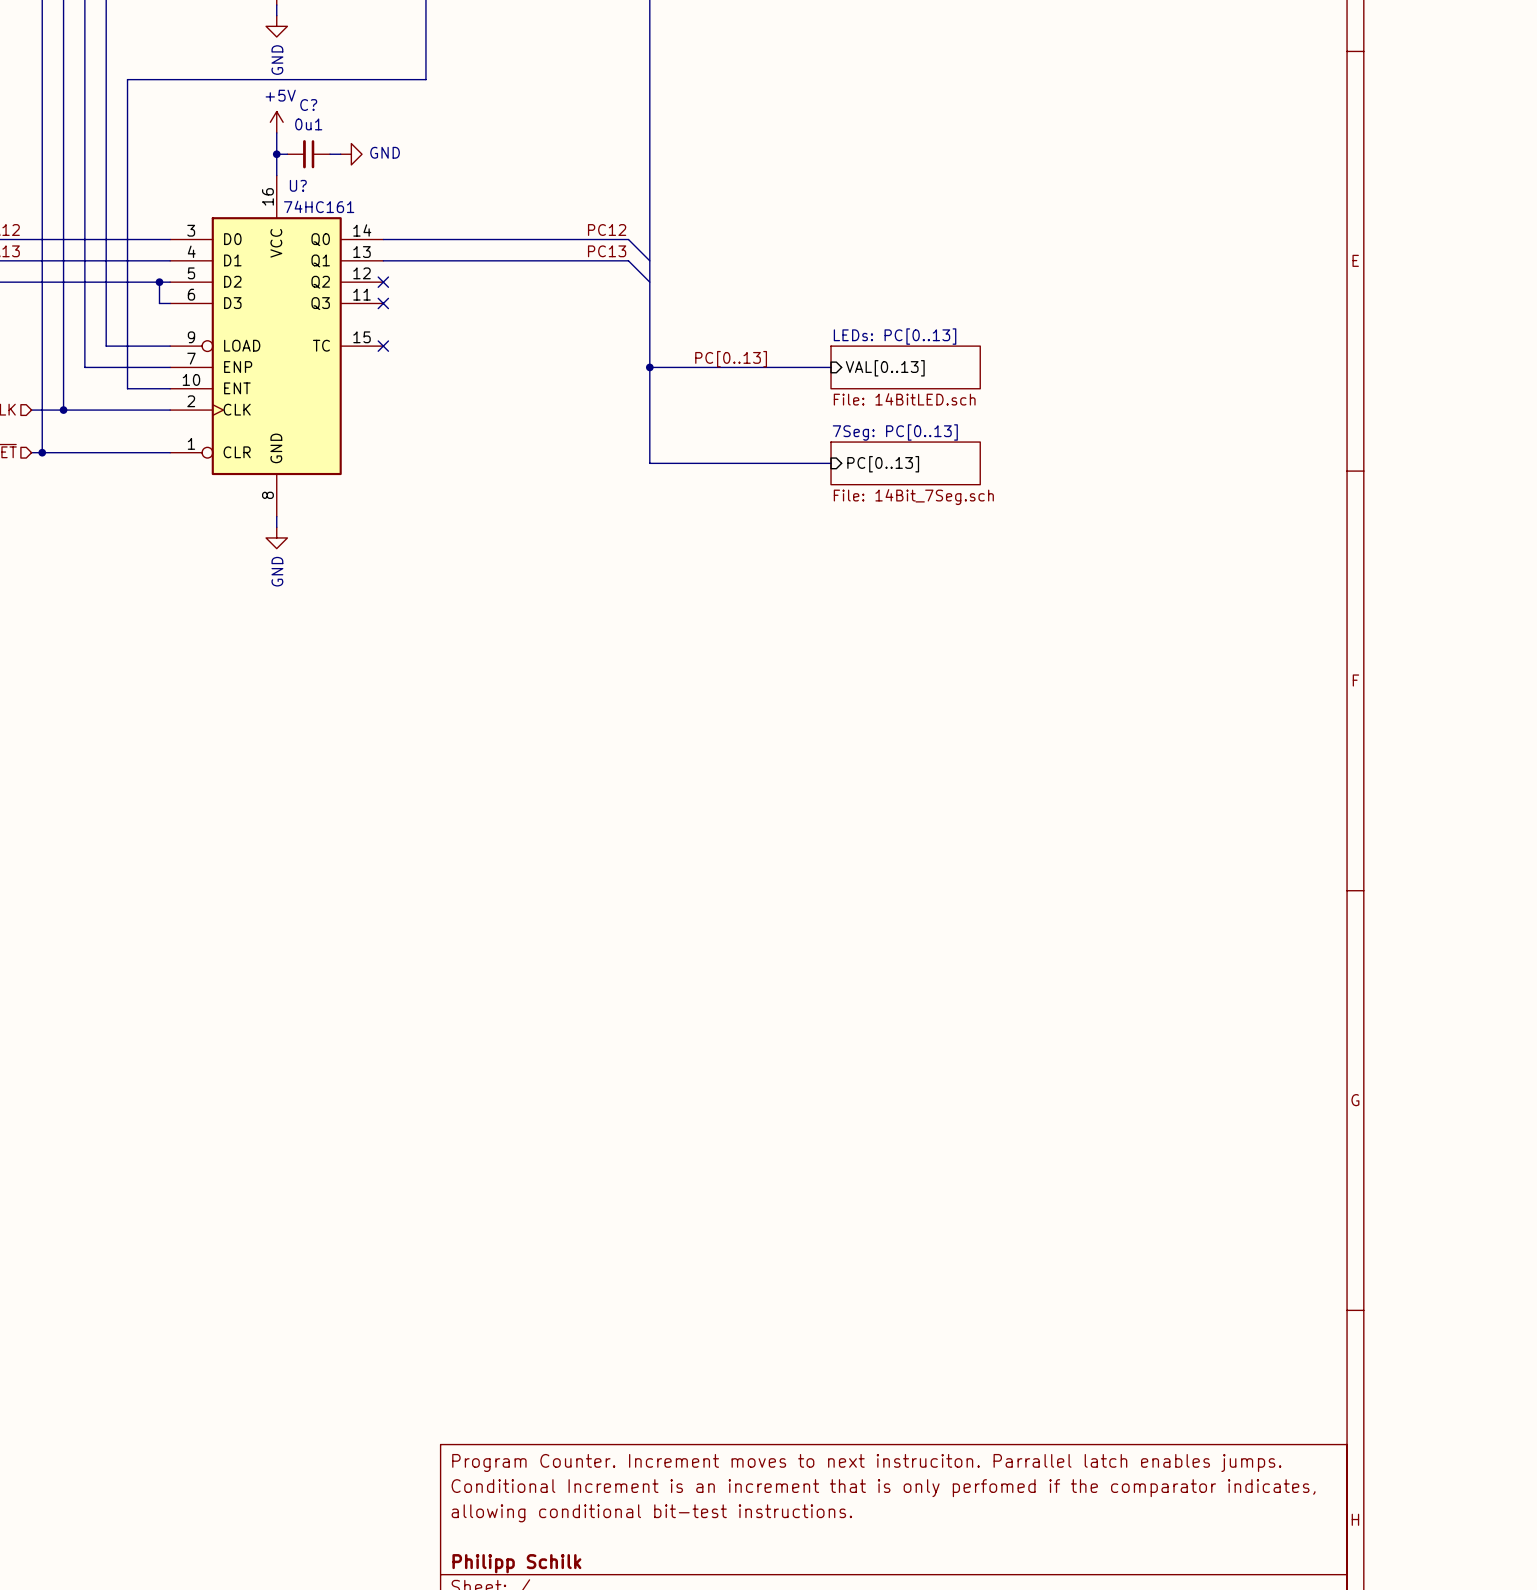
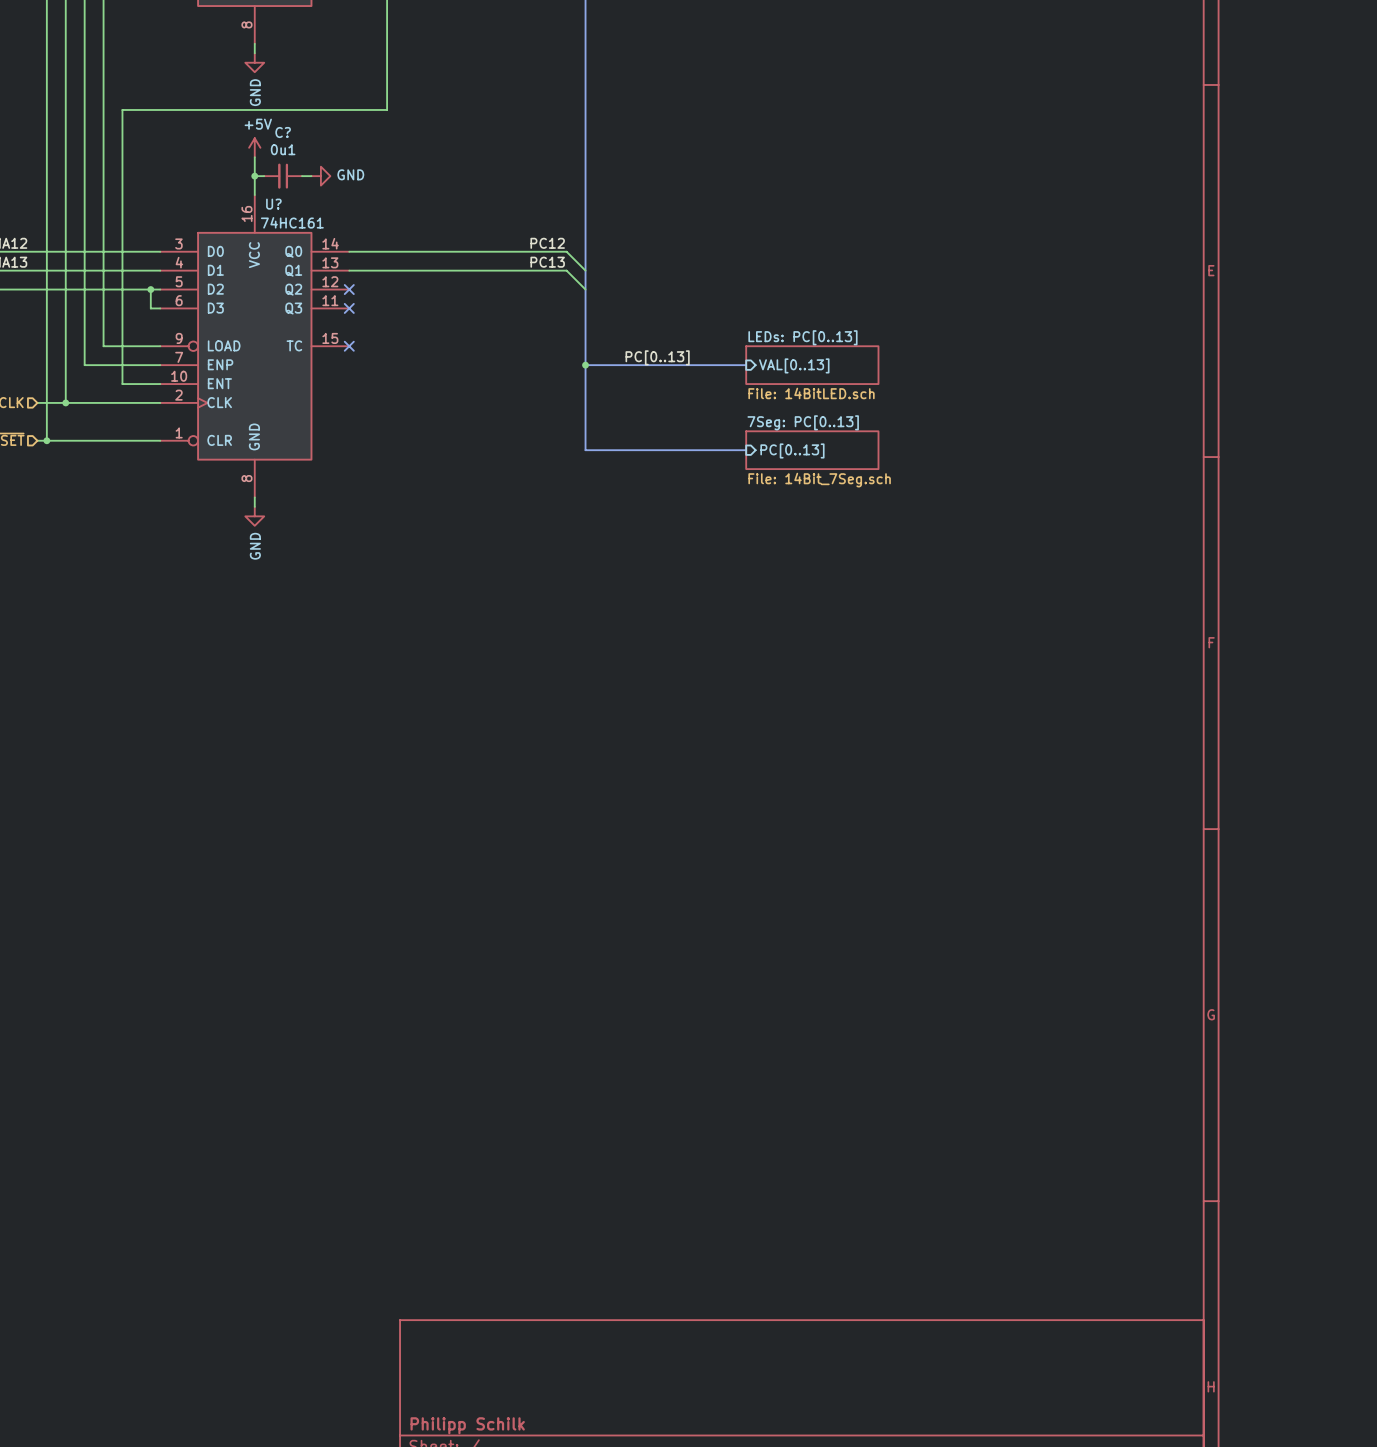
title block: Program Counter. Increment moves to next instruciton. Parrallel latch enables jumps. (866, 1462) -> none
title block: Conditional Increment is an increment that is only perfomed if the comparator indicates, (883, 1488) -> none
title block: allowing conditional bit-test instructions. (651, 1513) -> none

